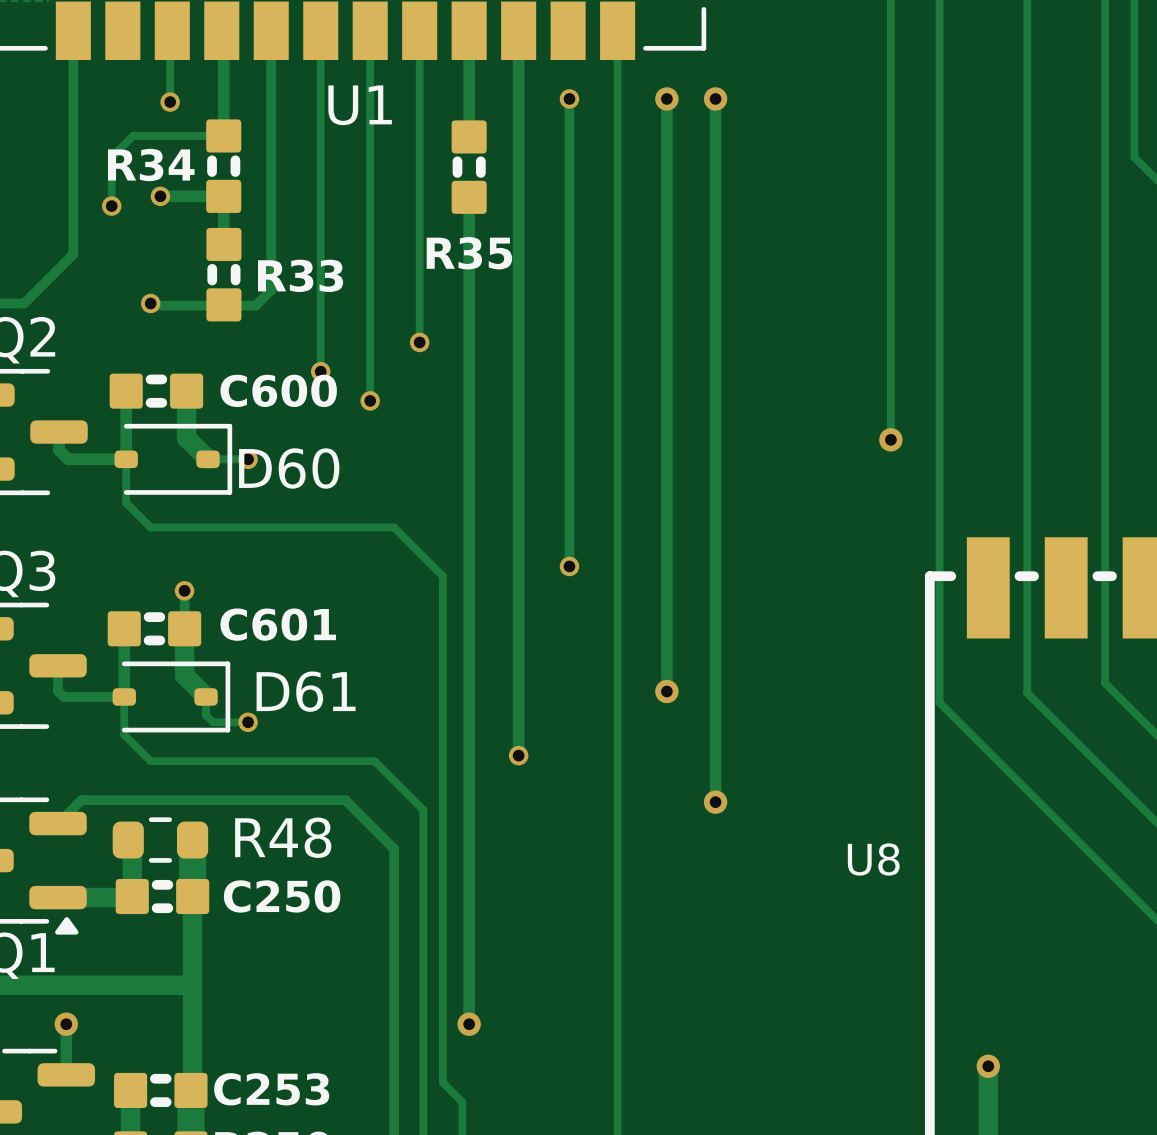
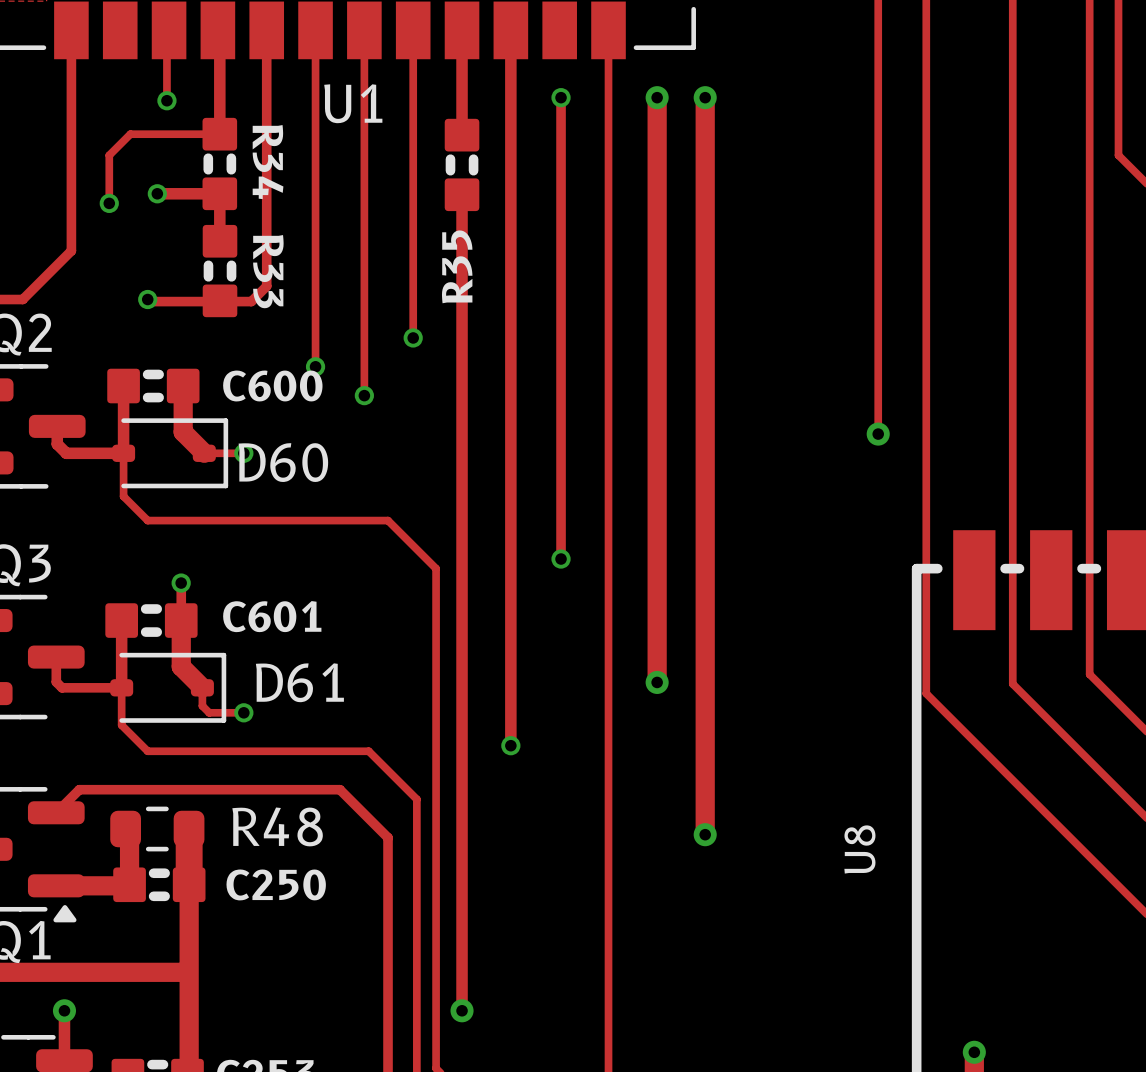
track width: thin (666, 98) (666, 691) -> thick (657, 97) (657, 682)
track width: thin (715, 98) (715, 802) -> thick (705, 97) (705, 791)
R34 name rotation: 0° (151, 165) -> 90° clockwise (268, 162)
R34 name position: R34 (151, 165) -> R34 (268, 162)
R35 name rotation: 0° (469, 253) -> 90° counterclockwise (457, 266)
R33 name rotation: 0° (300, 275) -> 90° clockwise (268, 271)
track: none -> (705, 791) (705, 834)
via position: (715, 802) -> (705, 834)
U8 name rotation: 0° (873, 859) -> 90° counterclockwise (859, 849)

